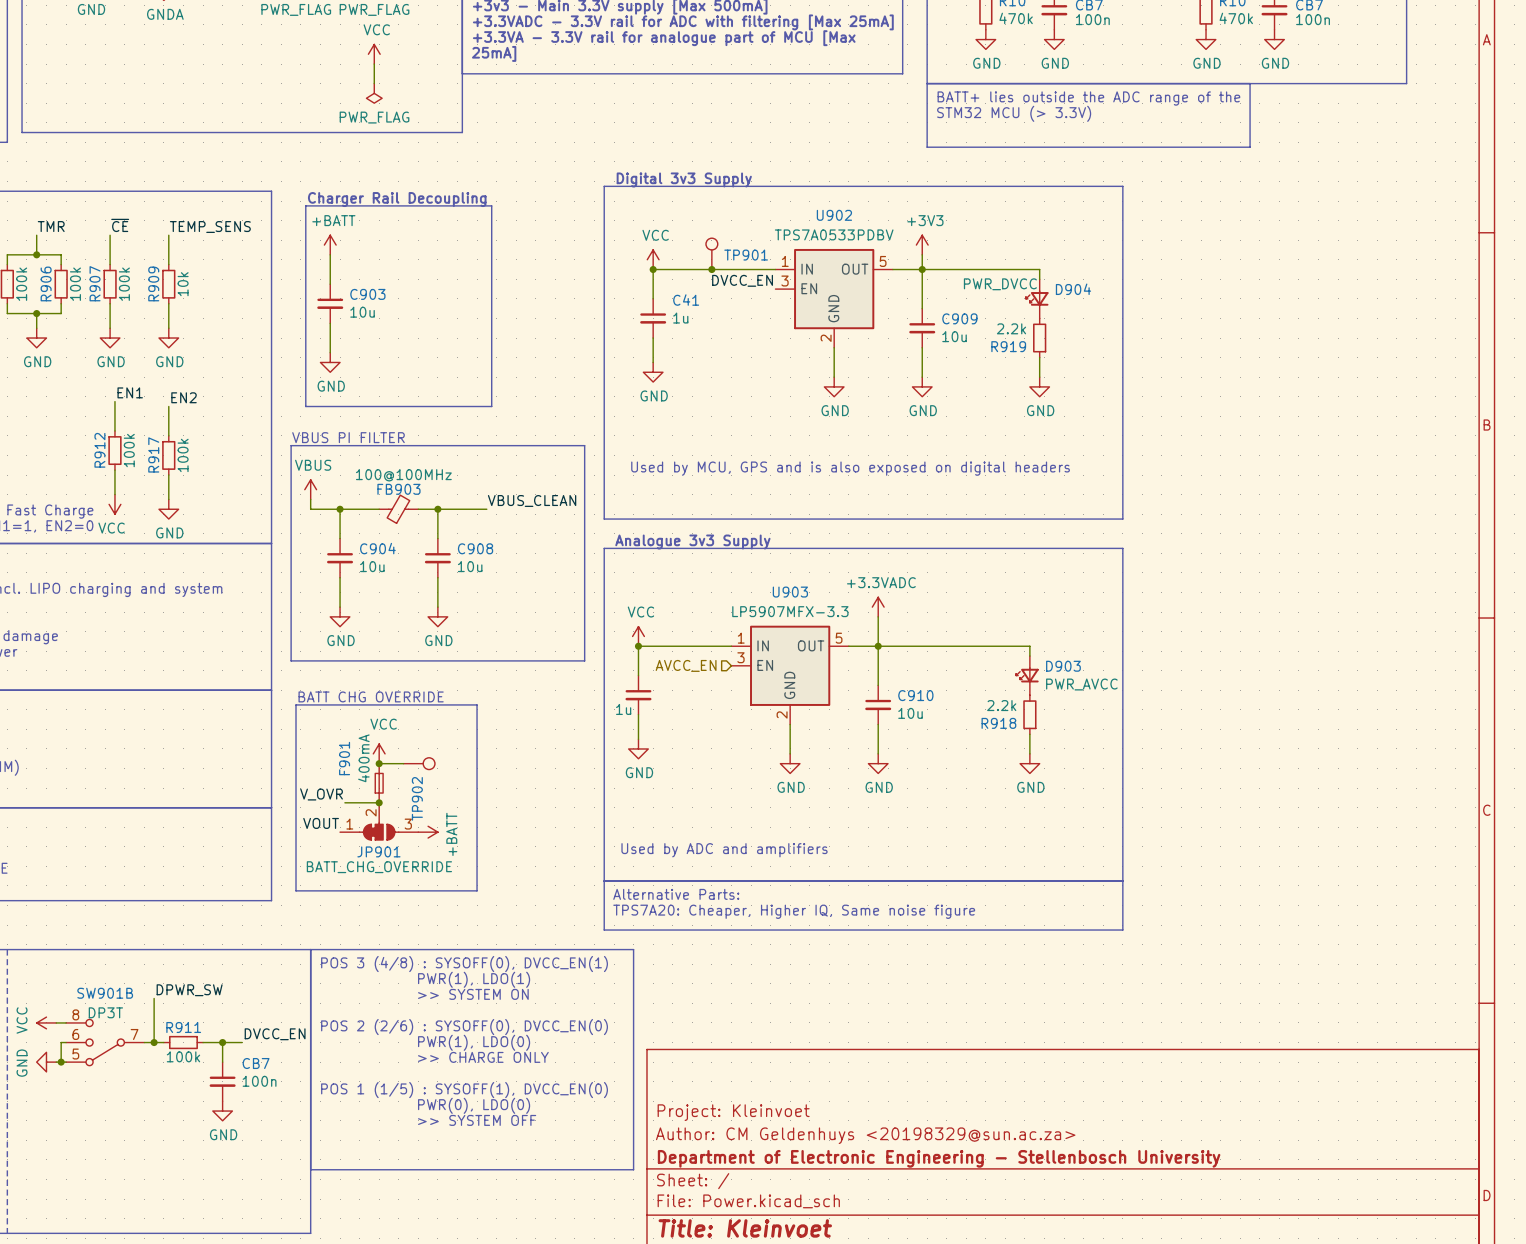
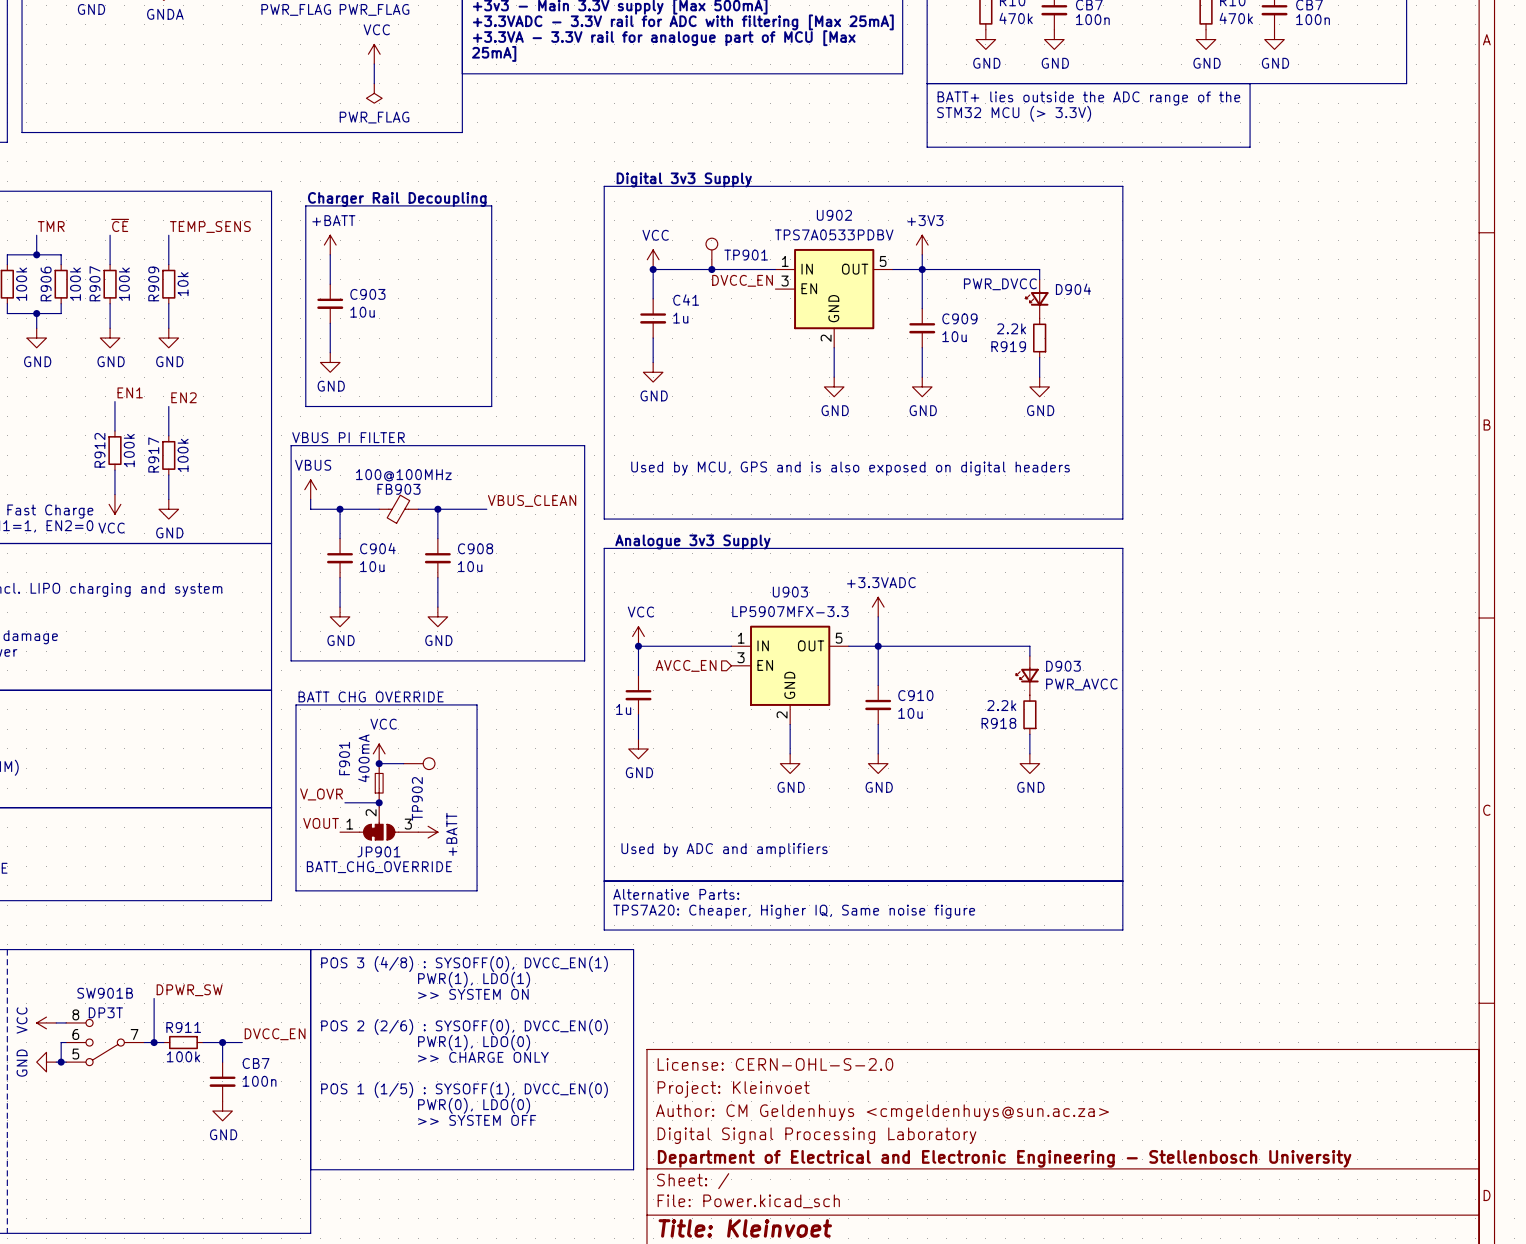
title block: none -> License: CERN-OHL-S-2.0 (775, 1064)
title block: none -> Project: Kleinvoet (733, 1089)
title block: Project: Kleinvoet (733, 1112) -> Author: CM Geldenhuys <cmgeldenhuys@sun.ac.za> (882, 1112)
title block: Author: CM Geldenhuys <20198329@sun.ac.za> (865, 1135) -> Digital Signal Processing Laboratory (817, 1135)
title block: Department of Electronic Engineering - Stellenbosch University (939, 1158) -> Department of Electrical and Electronic Engineering - Stellenbosch University (1004, 1158)

